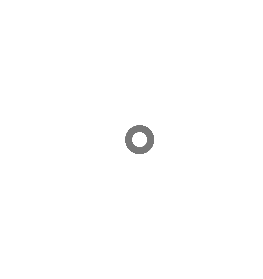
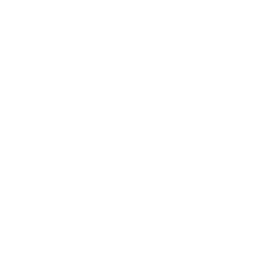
via: (139, 139) -> none

